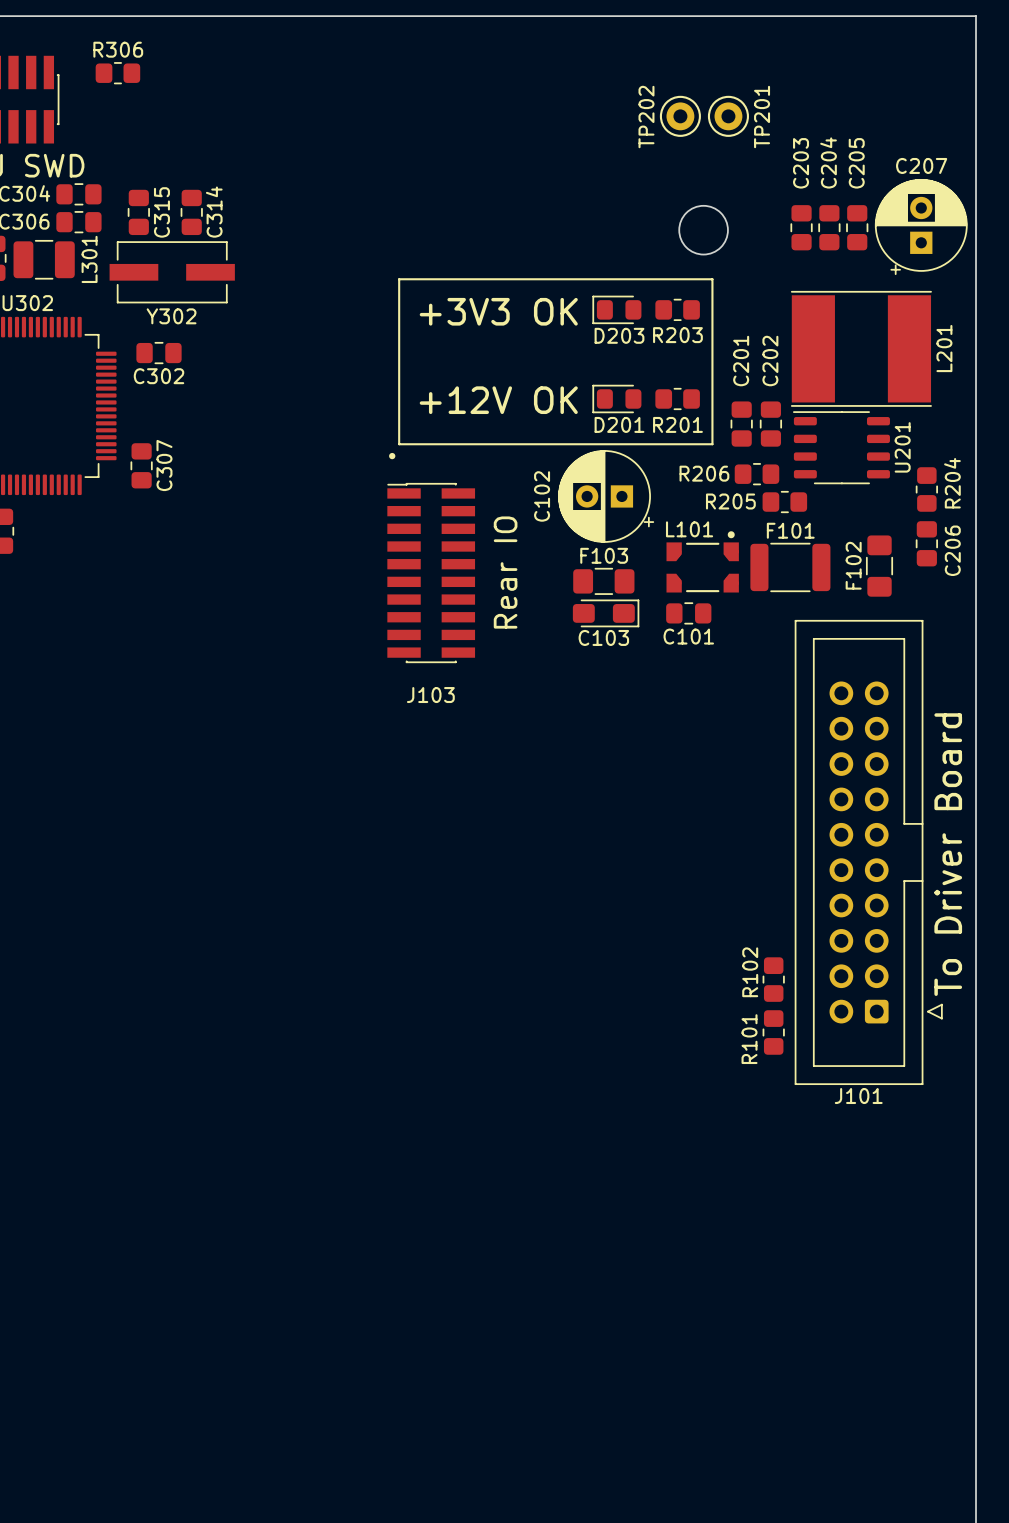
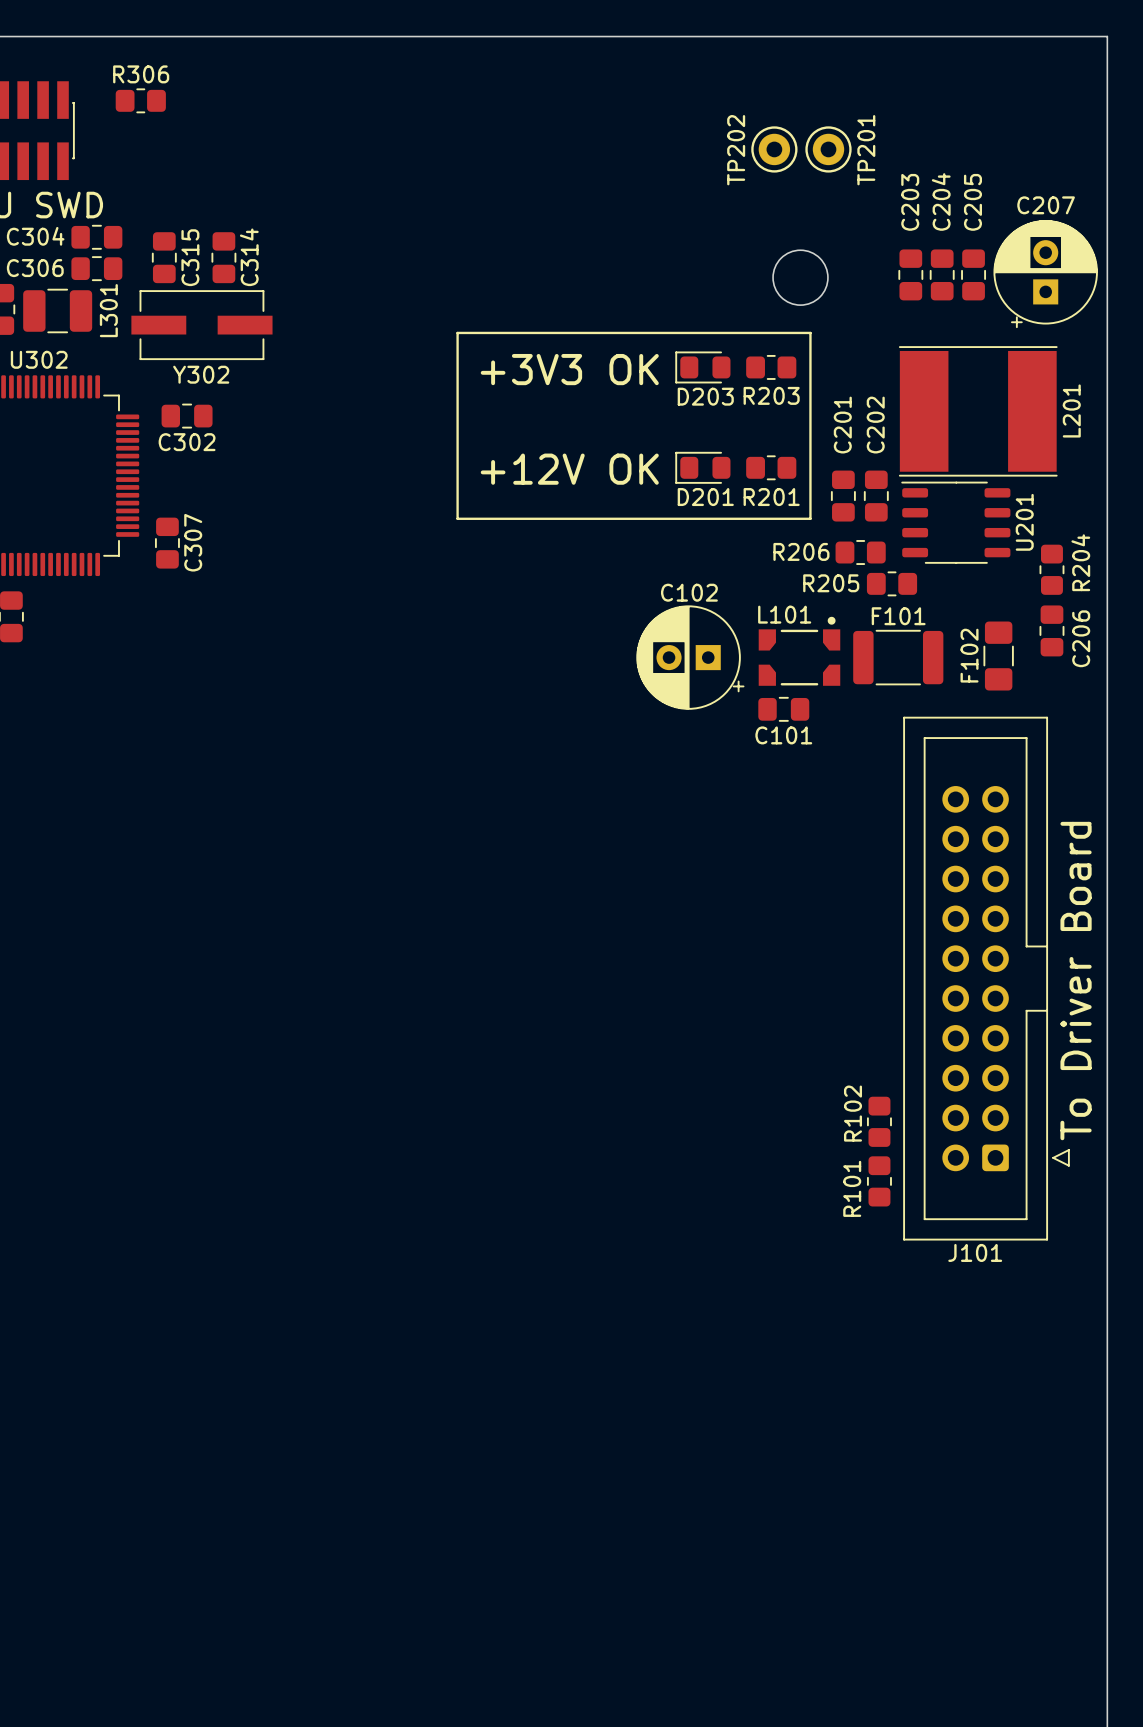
drawing: [389, 452, 396, 460] -> none
C102 name rotation: 0° (542, 496) -> 90° clockwise (689, 592)
C102 name position: C102 (542, 496) -> C102 (689, 592)
C102 position: (606, 496) -> (690, 657)
text: Rear IO (505, 572) -> none
J103: (431, 573) -> none
F103: (603, 581) -> none
C103: (606, 613) -> none

